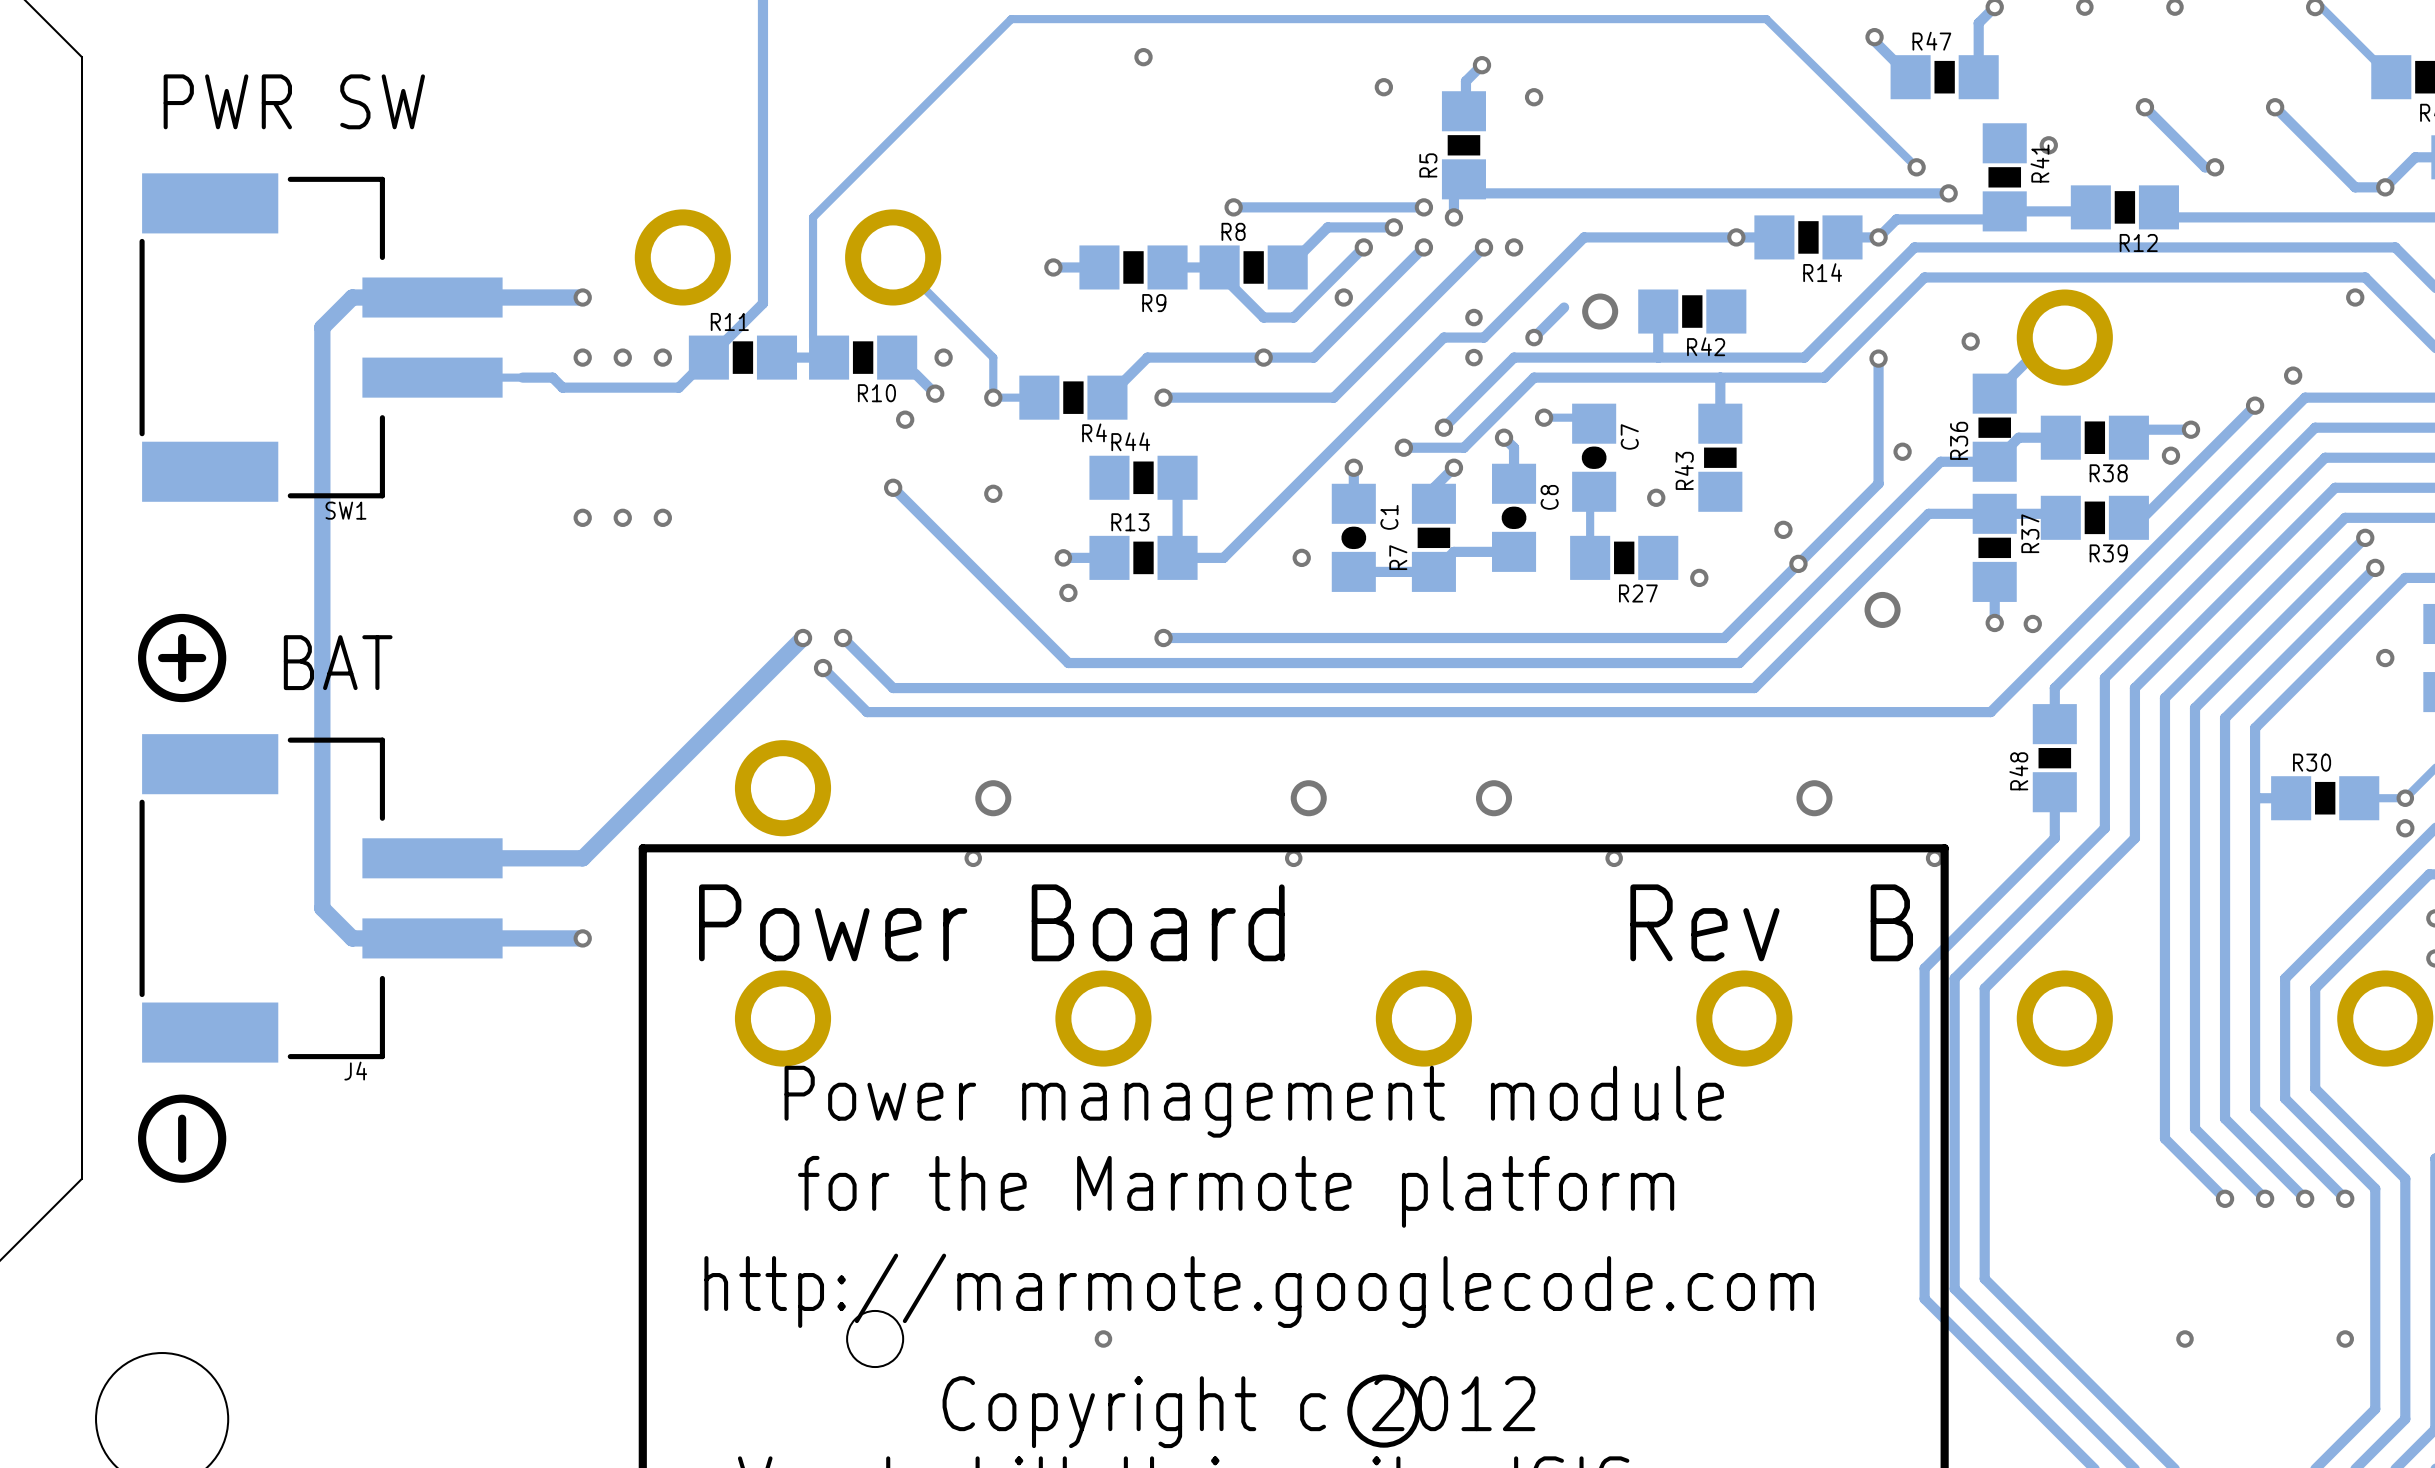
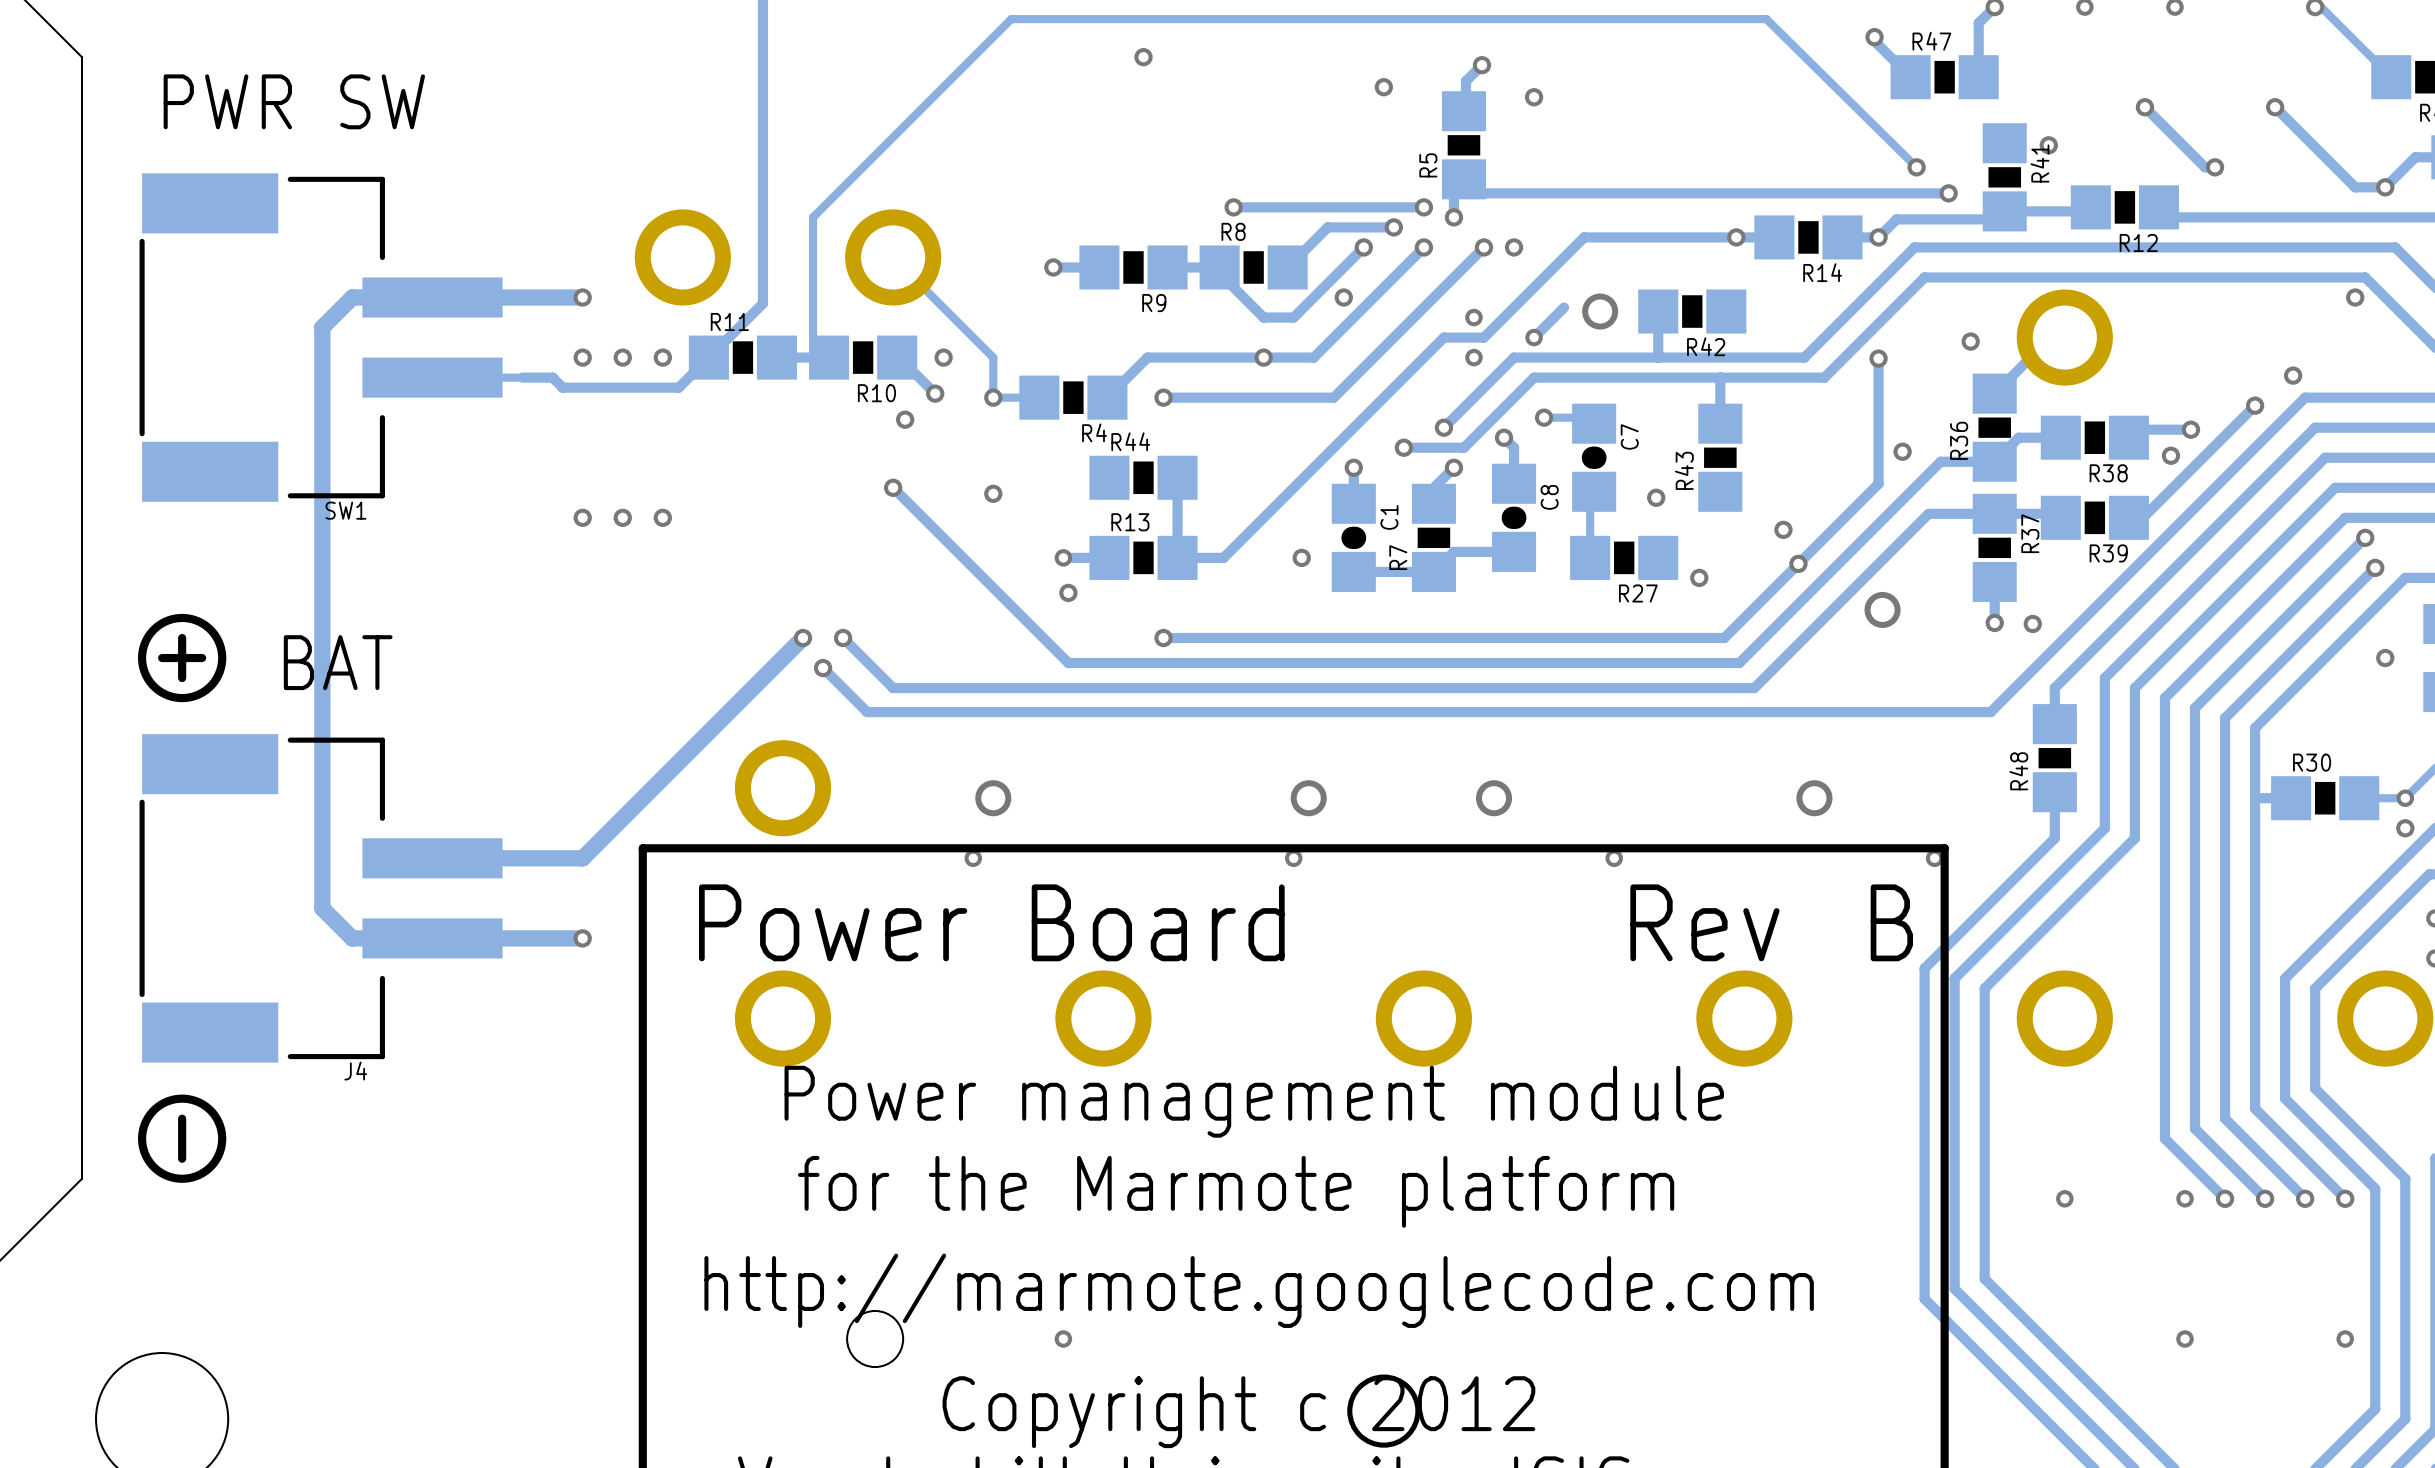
via: none -> (2064, 1198)
via: none -> (2184, 1198)
via position: (1103, 1338) -> (1063, 1338)

